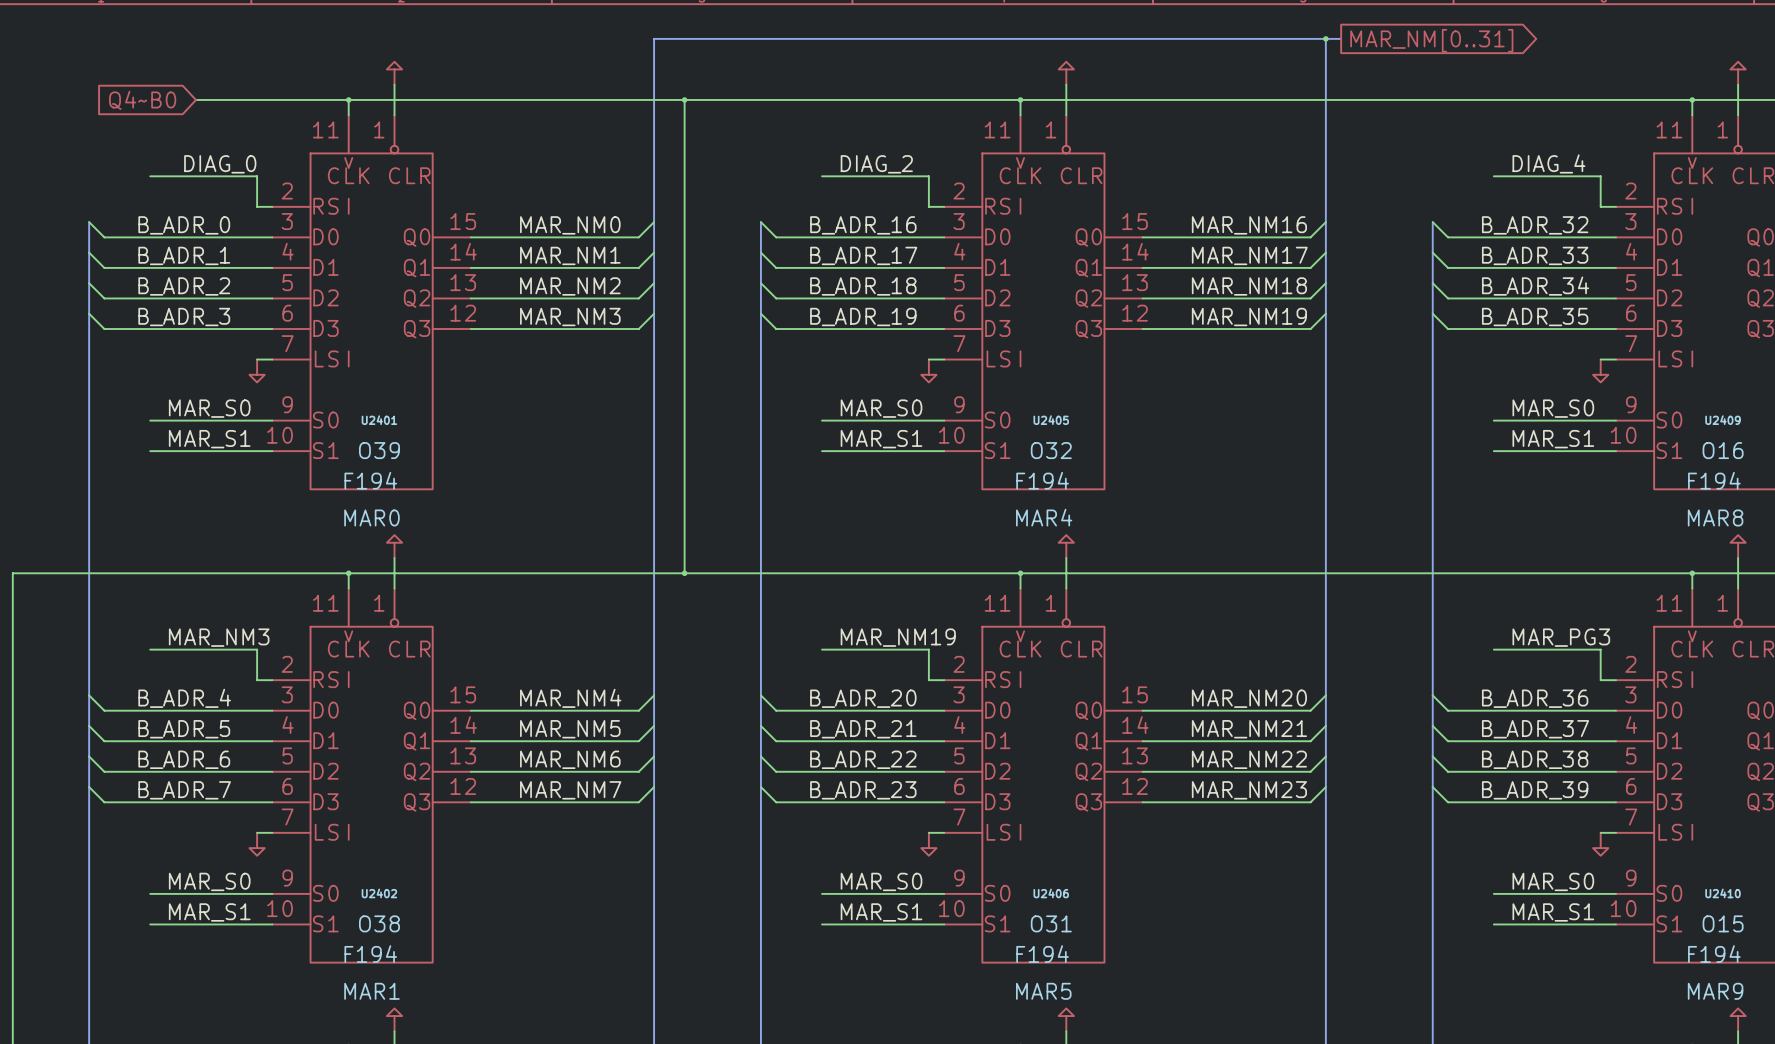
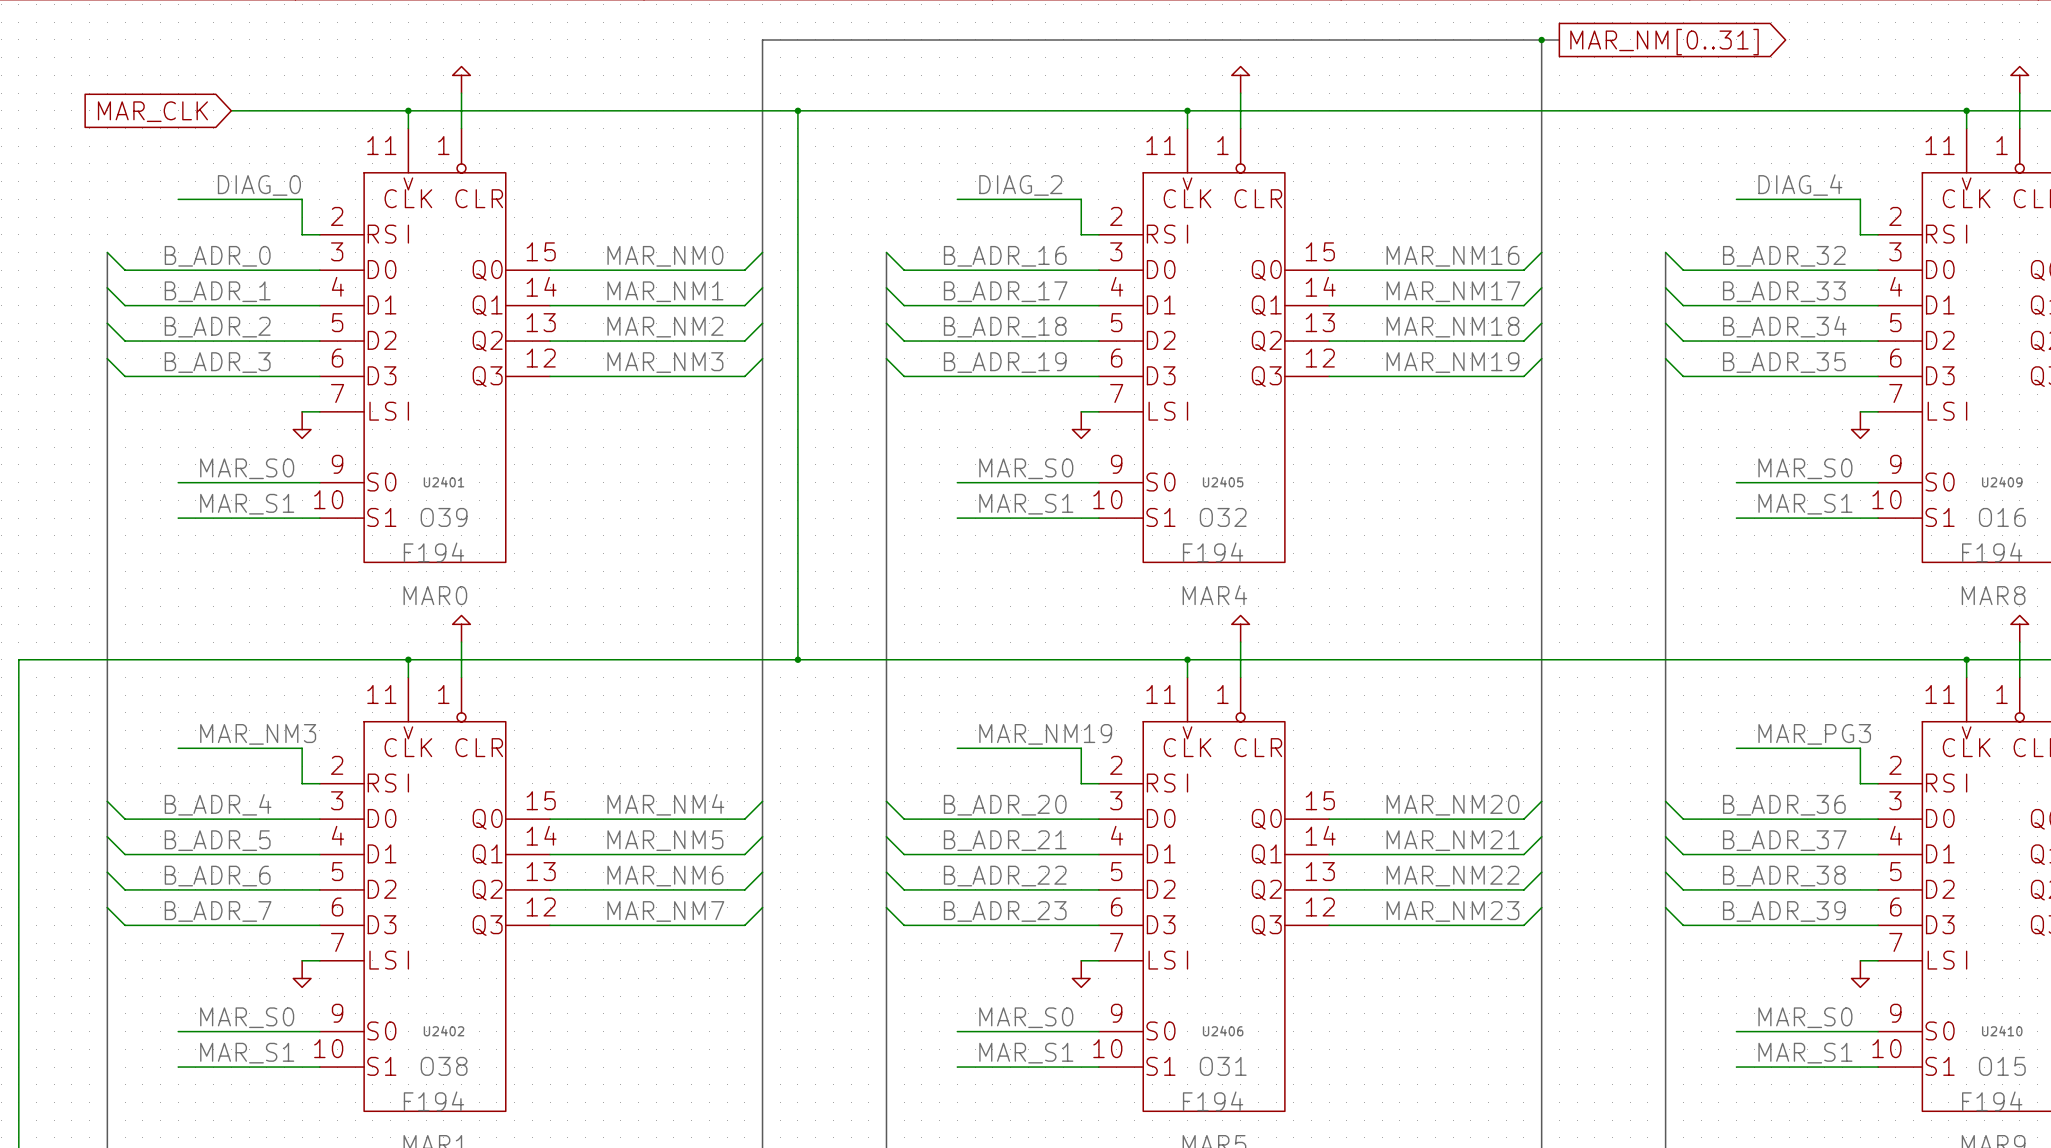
global label: Q4~B0 (142, 100) -> MAR_CLK (152, 111)

